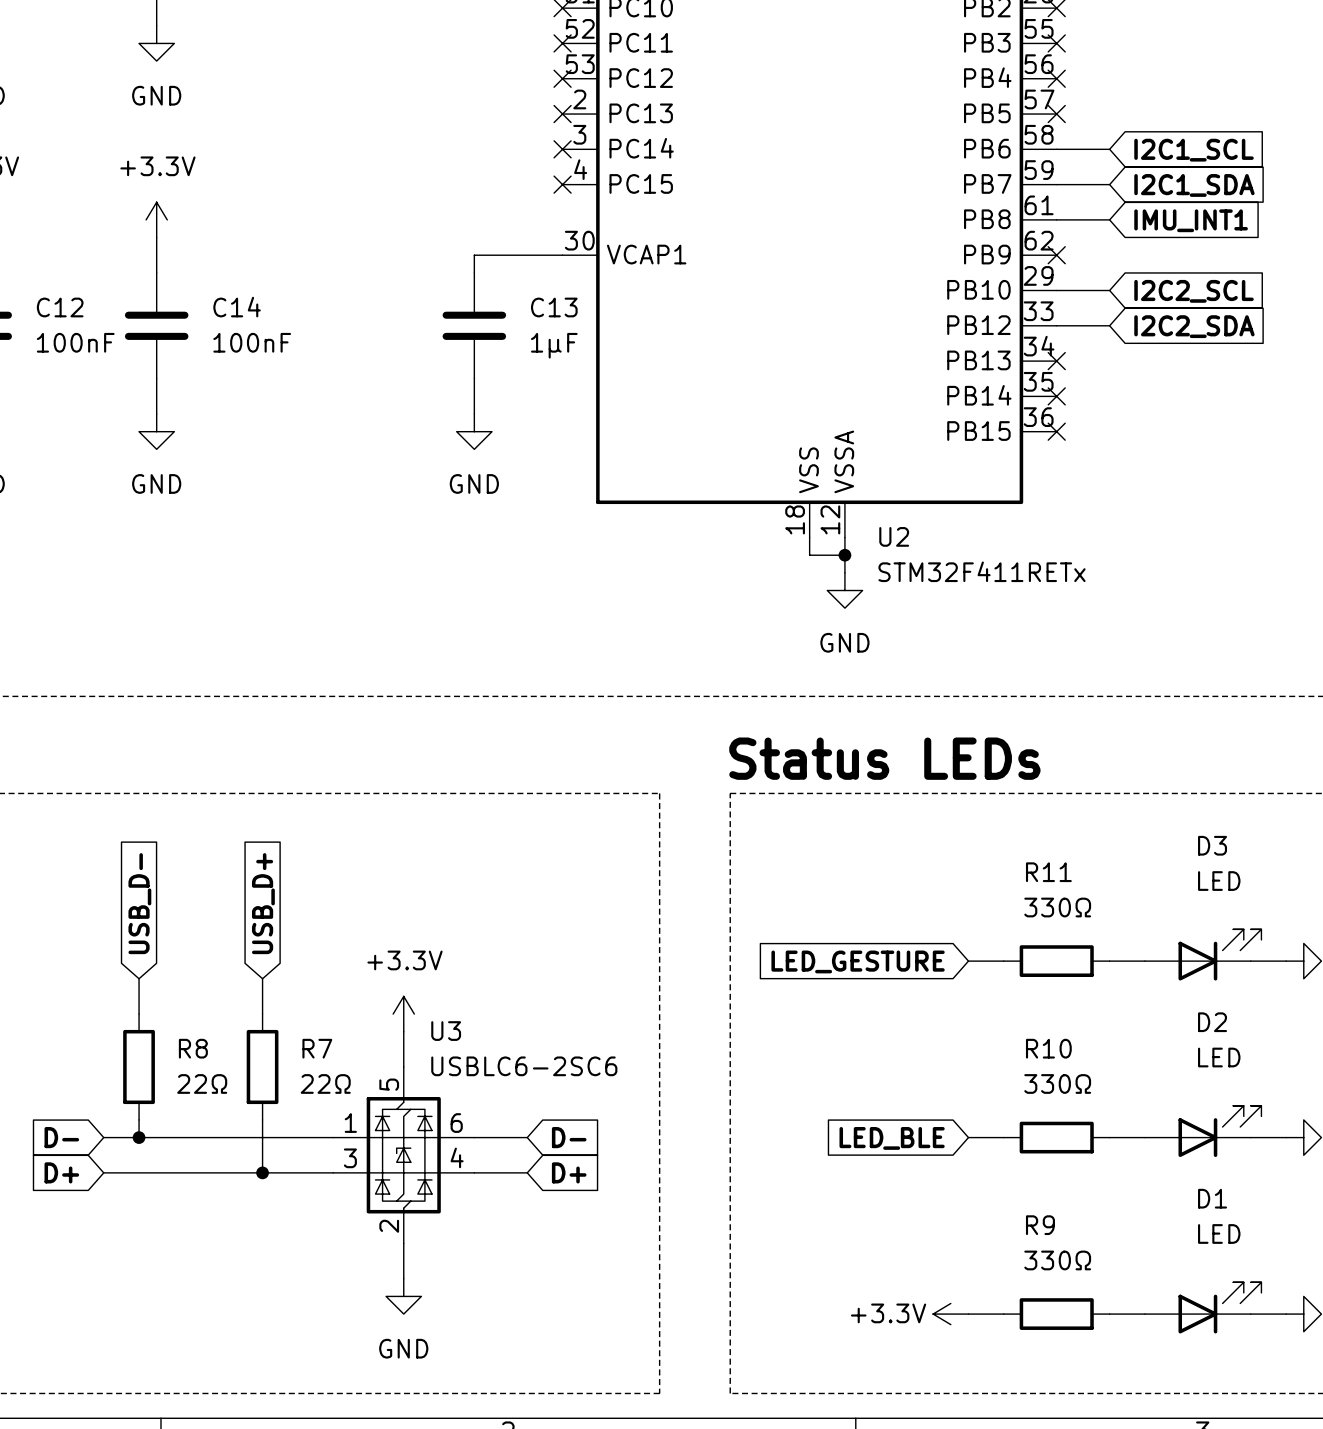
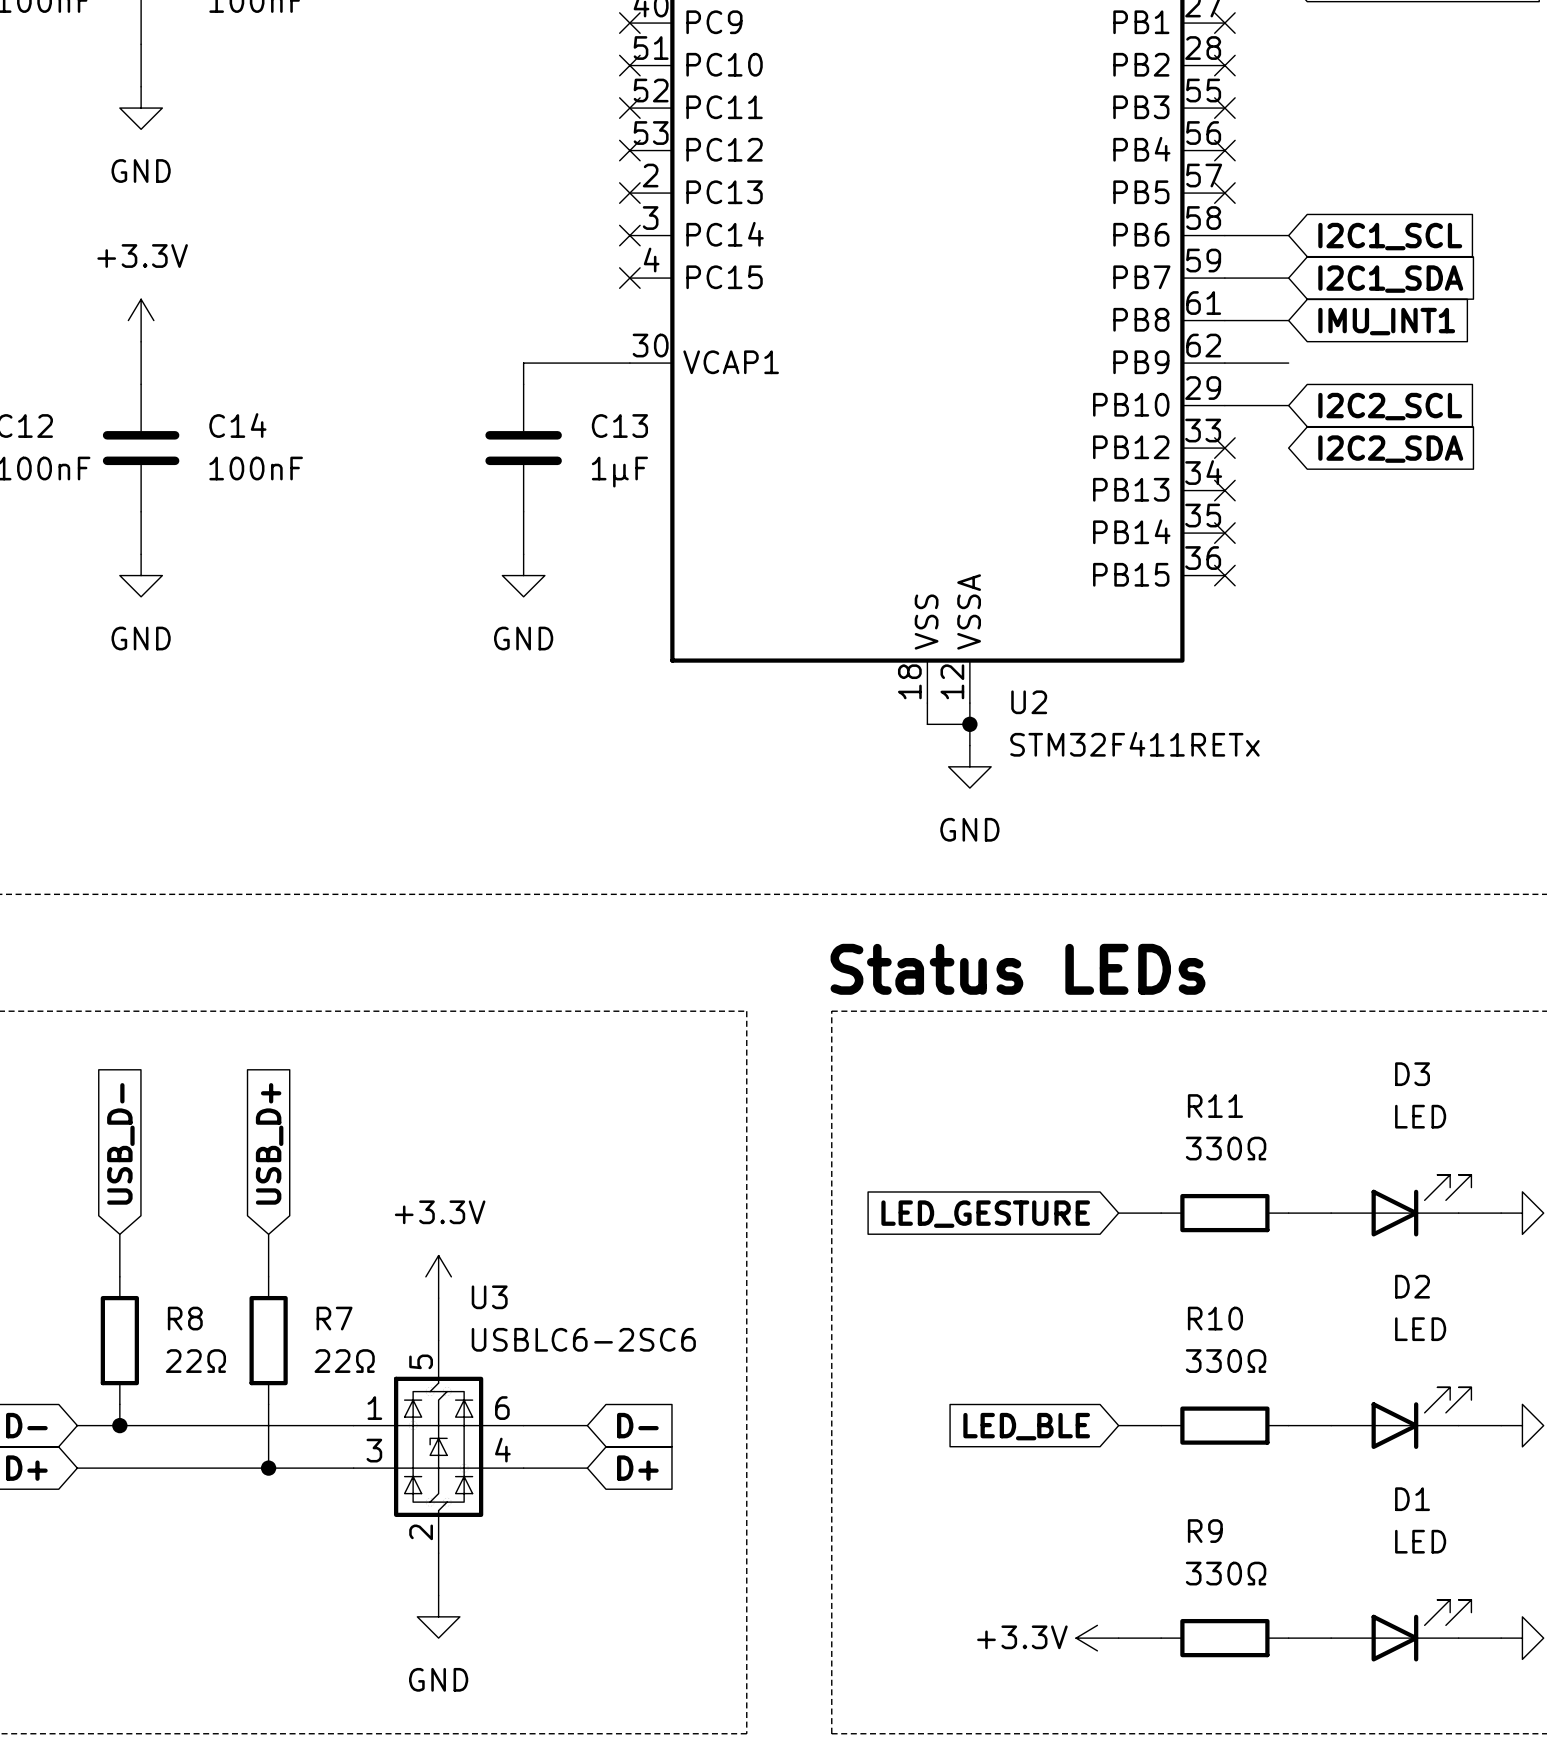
no-connect mark position: (1056, 255) -> (1224, 448)
wire: (1056, 325) (1109, 325) -> (1224, 363) (1288, 363)

